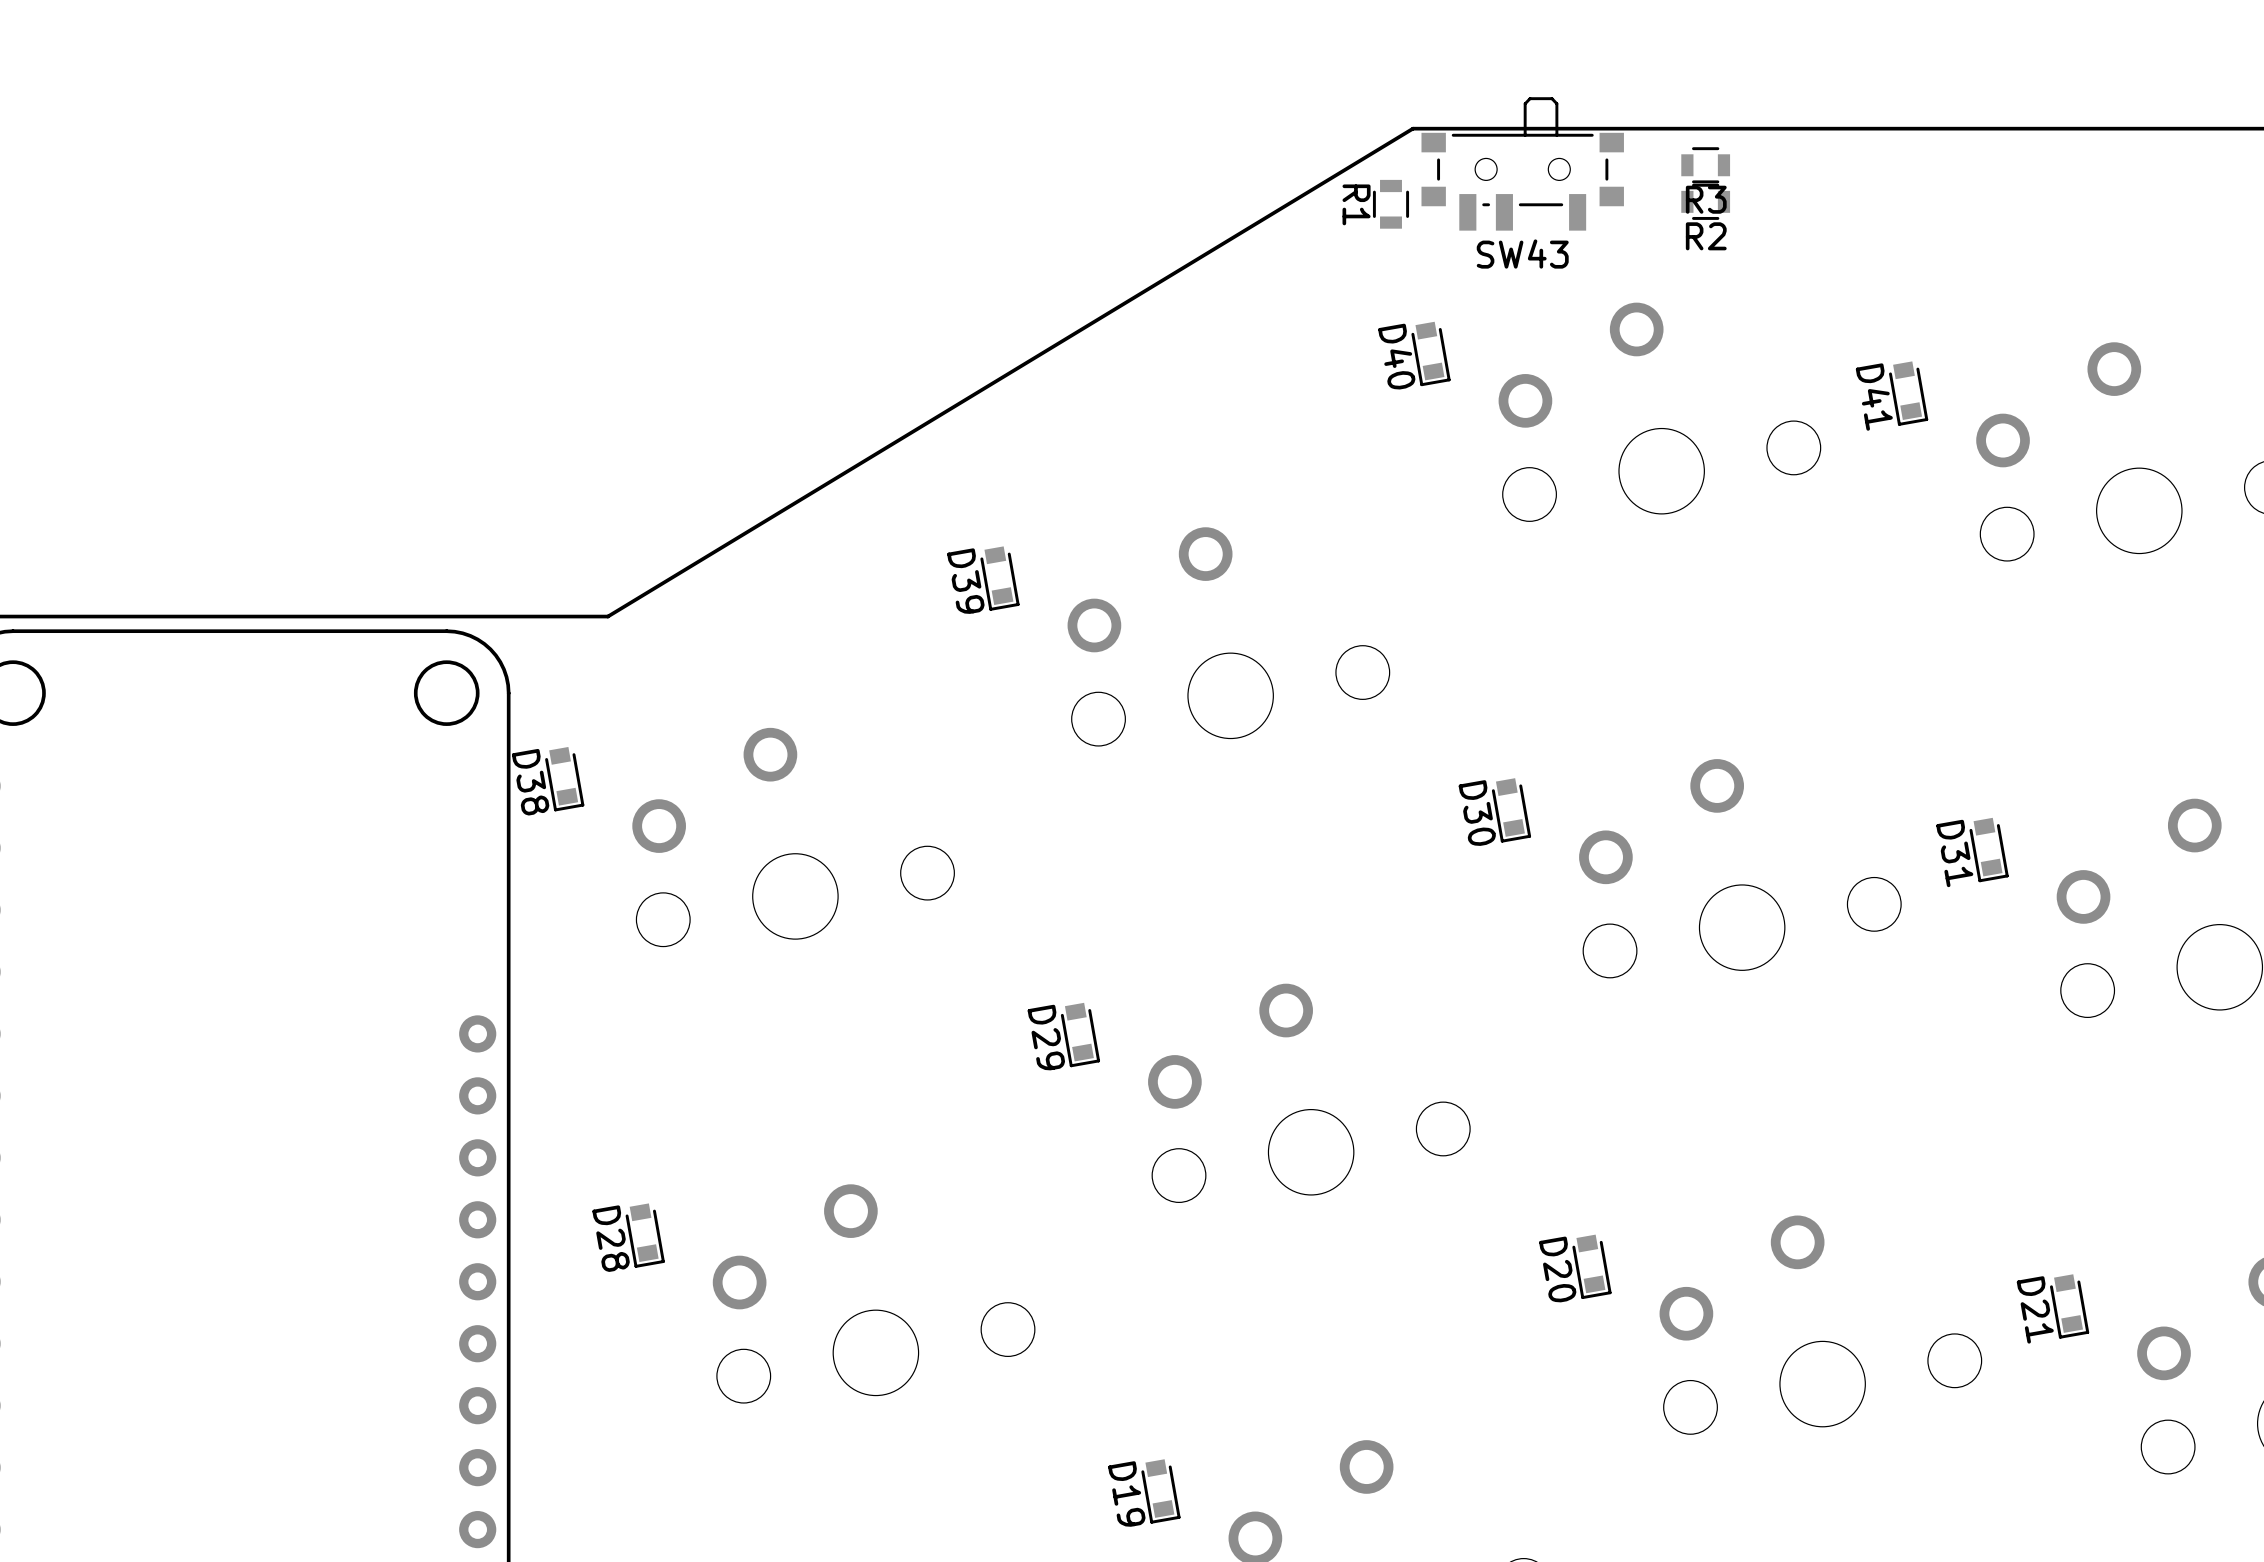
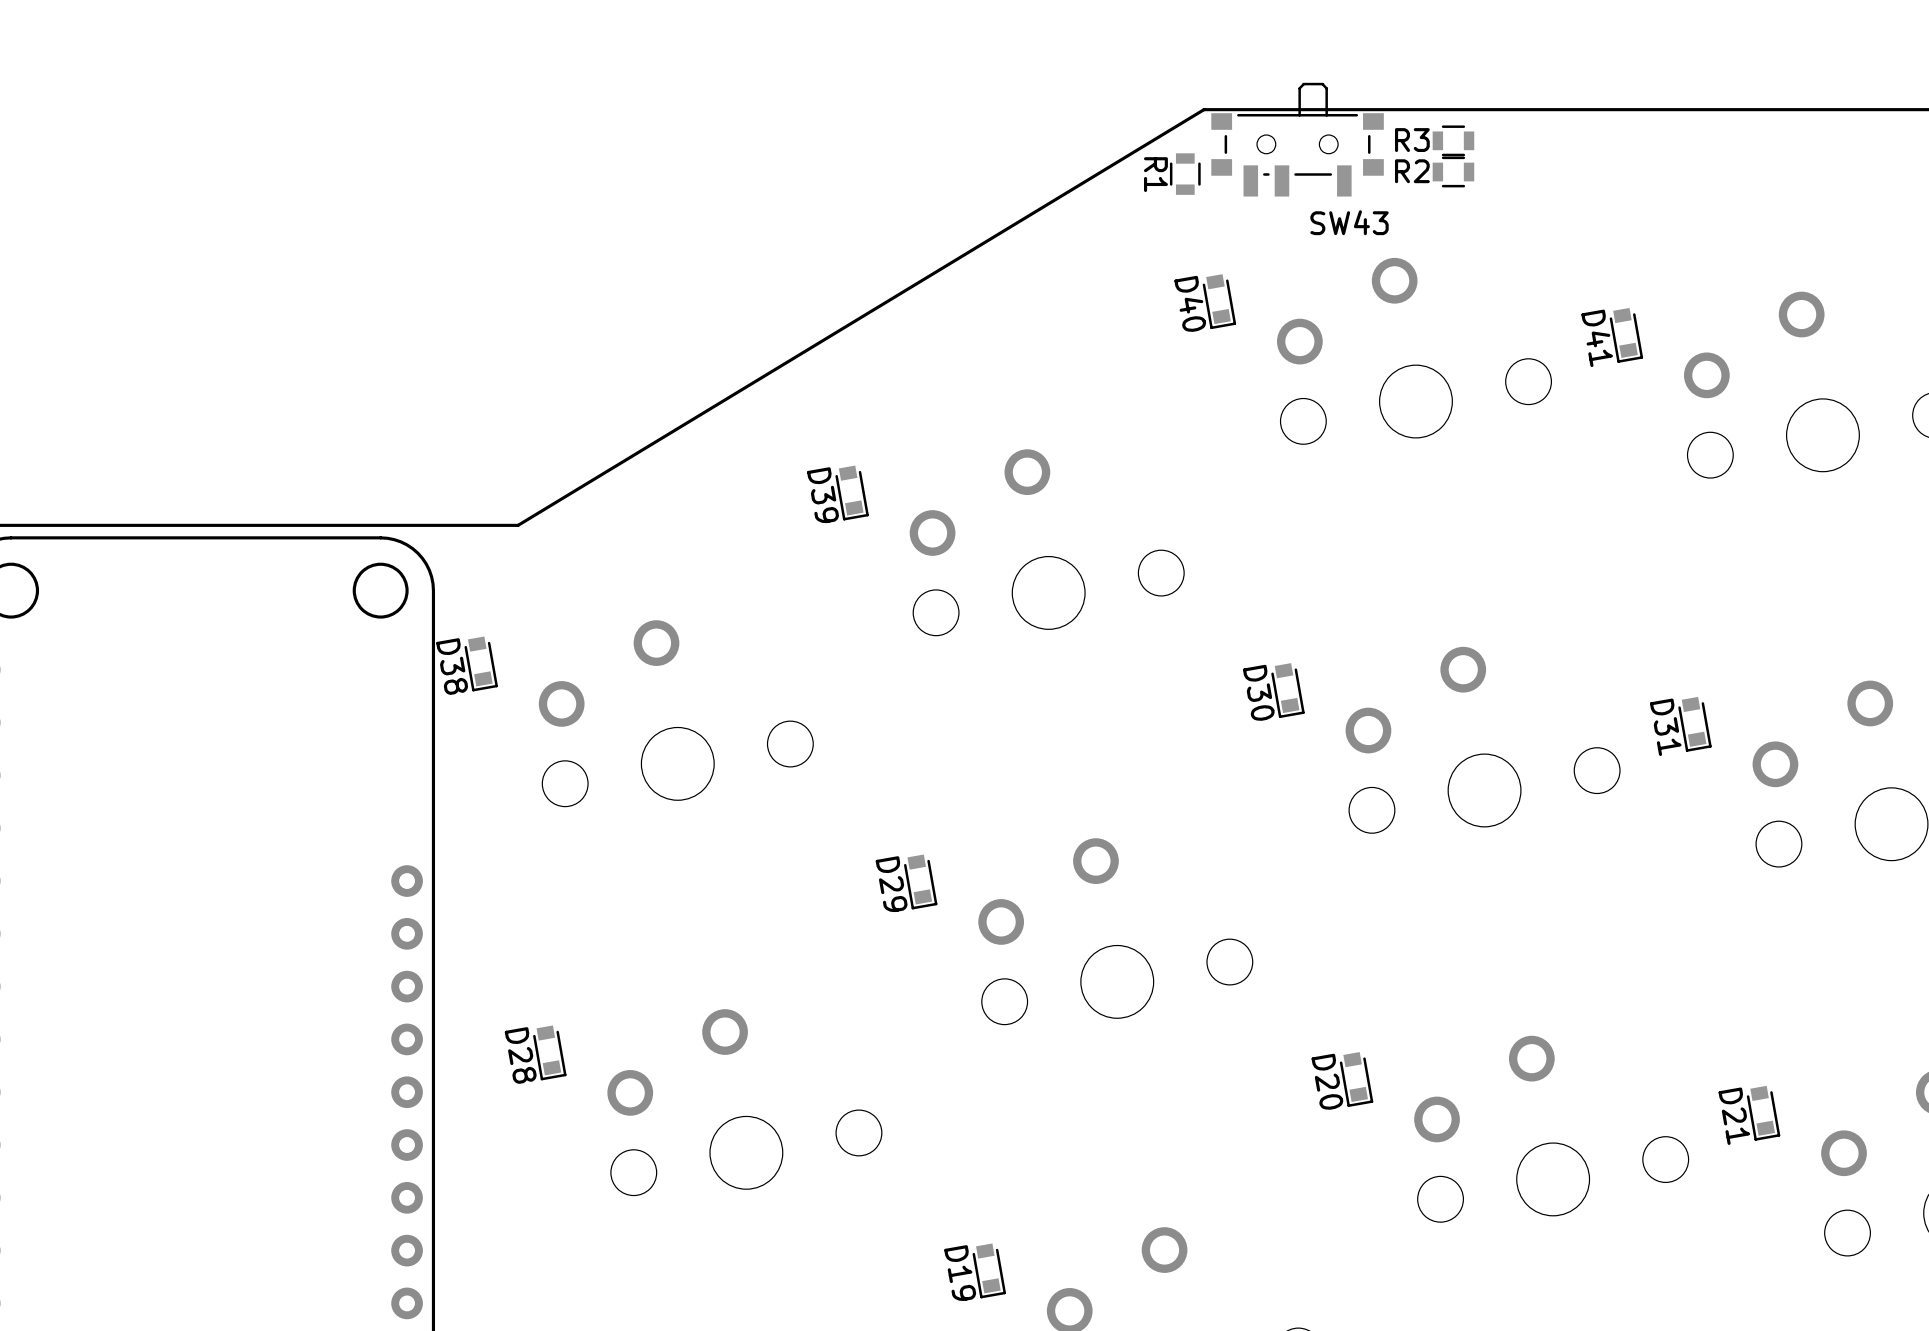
R3 name position: R3 (1706, 199) -> R3 (1412, 140)
R2 name position: R2 (1706, 236) -> R2 (1412, 171)
SW43 name position: SW43 (1522, 254) -> SW43 (1349, 222)

